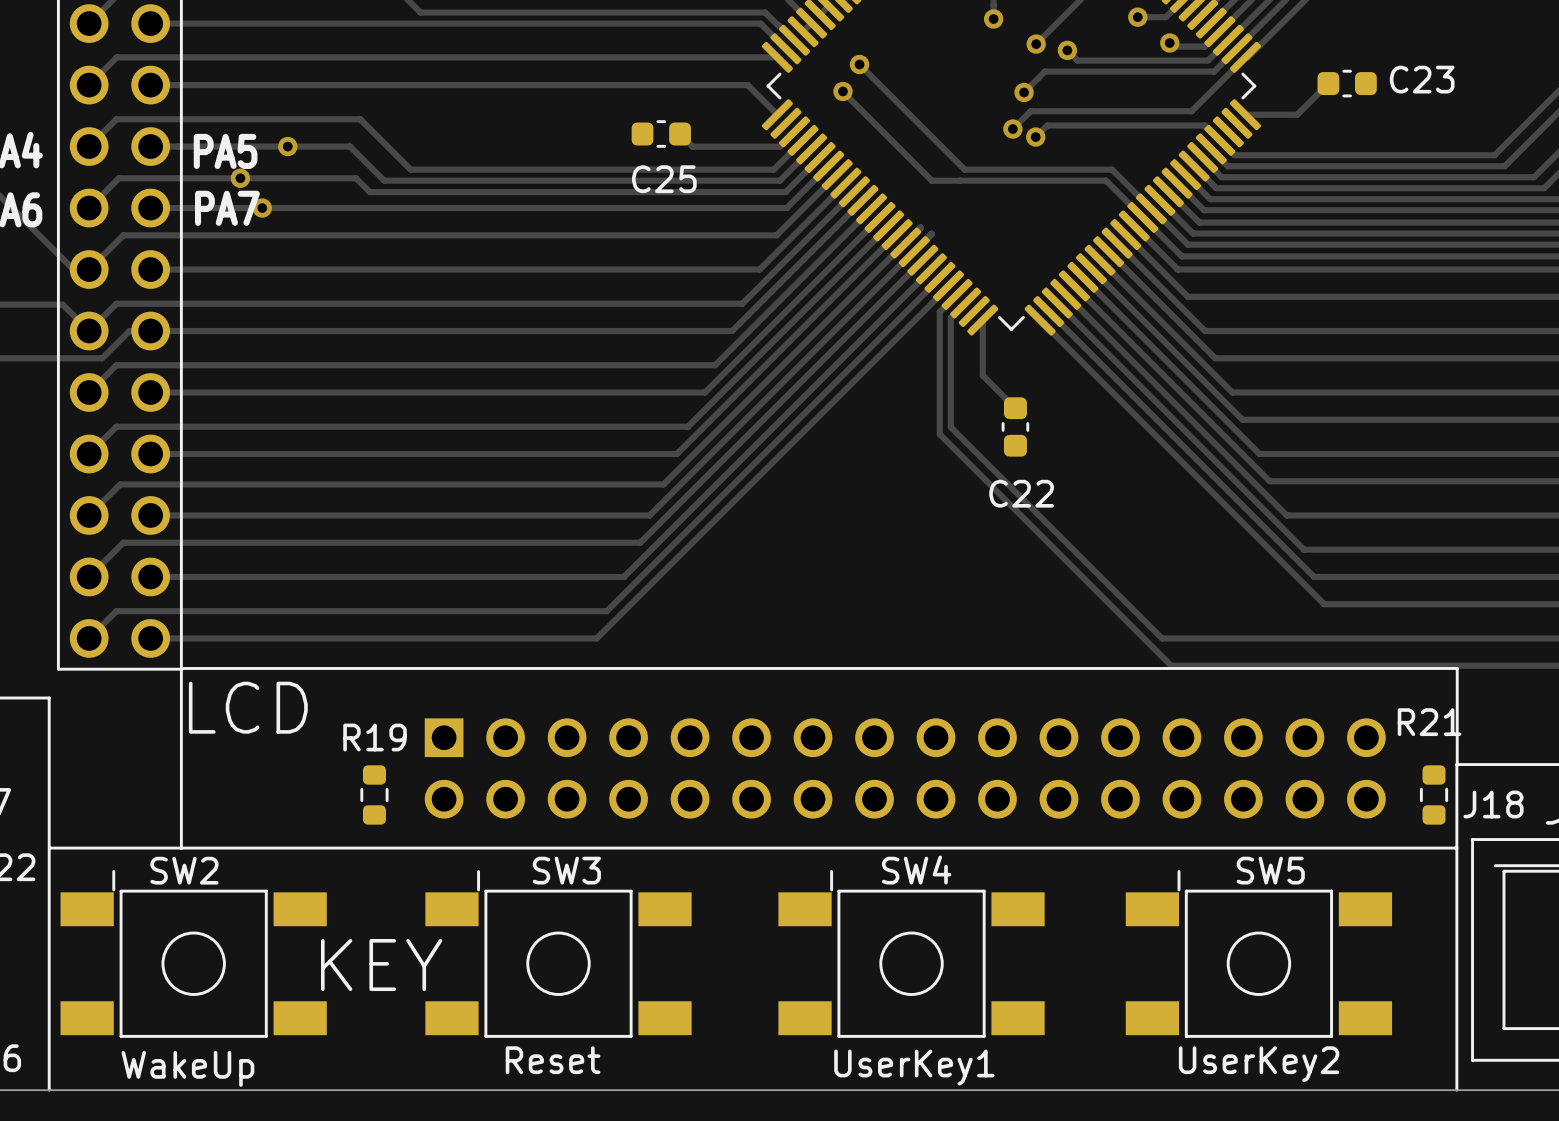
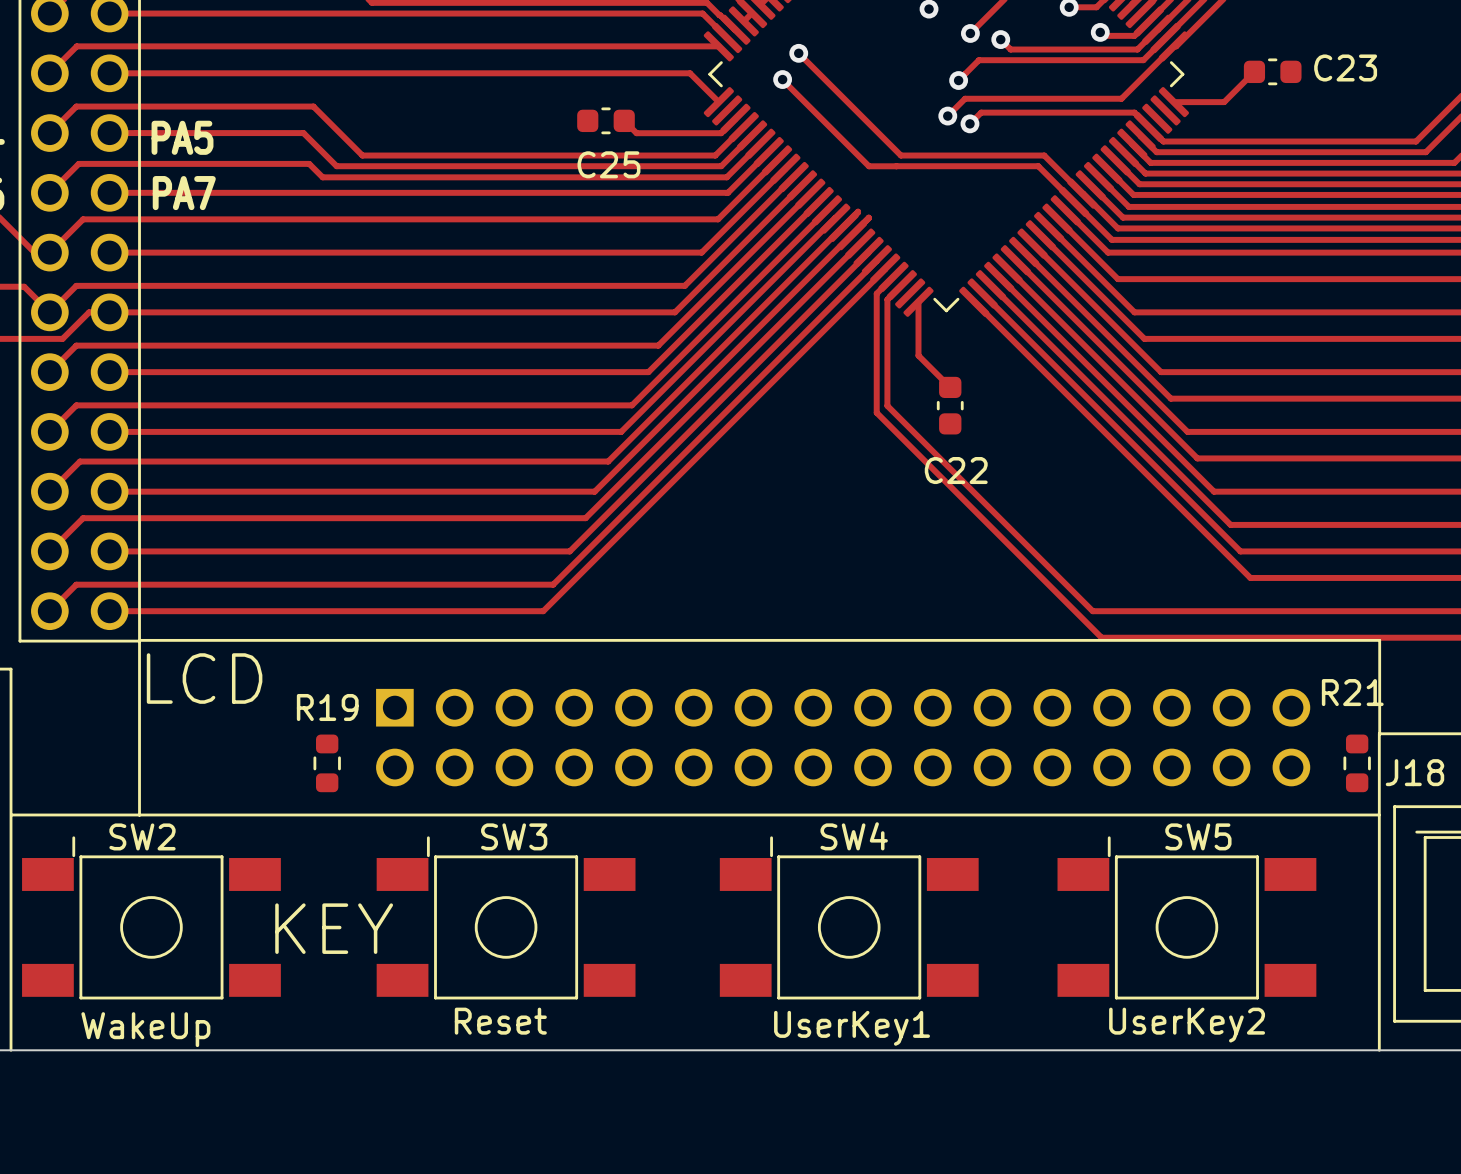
via: (287, 146) -> none
via: (240, 178) -> none
via: (262, 208) -> none

